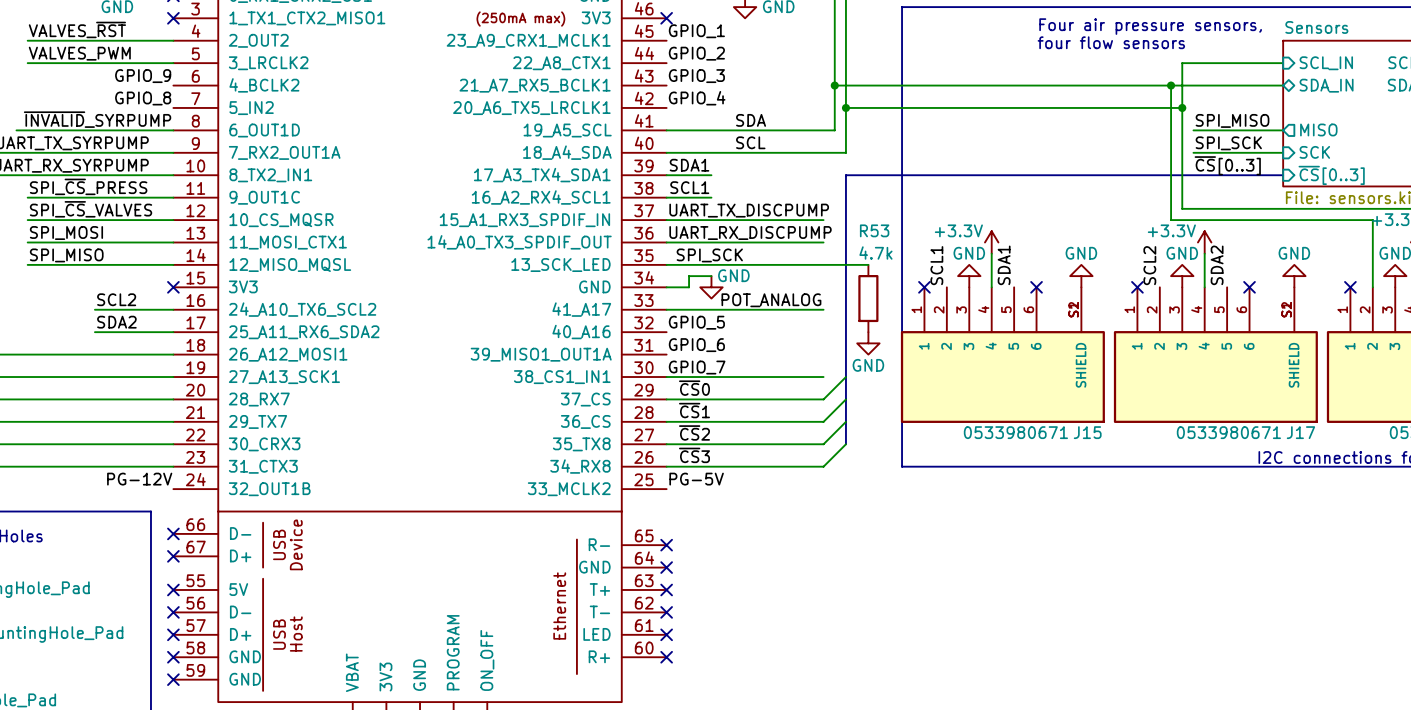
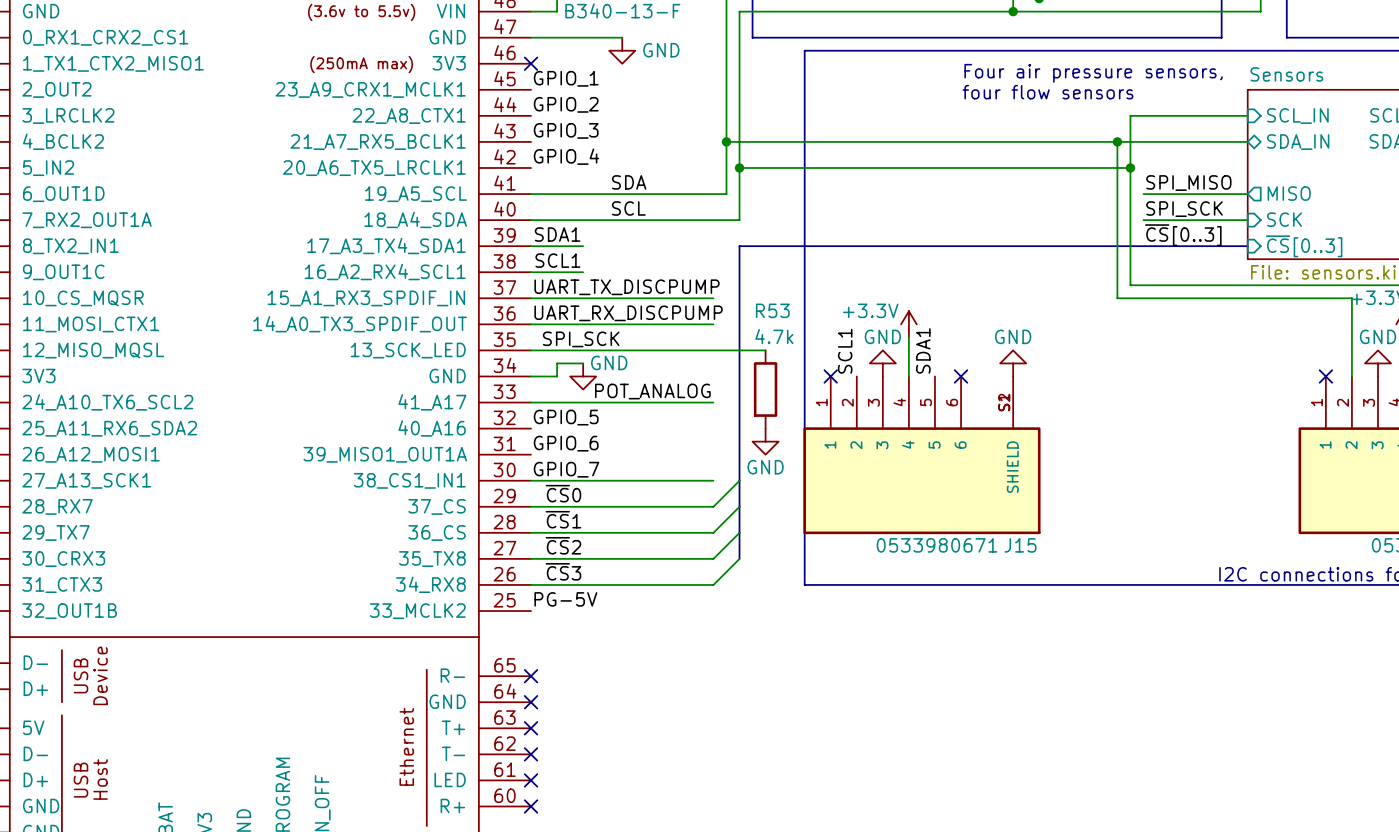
power symbol: +3.3V (1204, 242) -> none
wire: (1204, 253) (1204, 287) -> none
label: SCL2 (1149, 265) -> none
label: SDA2 (1217, 265) -> none
power symbol: GND (1182, 276) -> none
power symbol: GND (1294, 276) -> none
no-connect mark: (1137, 287) -> none
no-connect mark: (1249, 287) -> none
J17: 0533980671 (1215, 355) -> none

